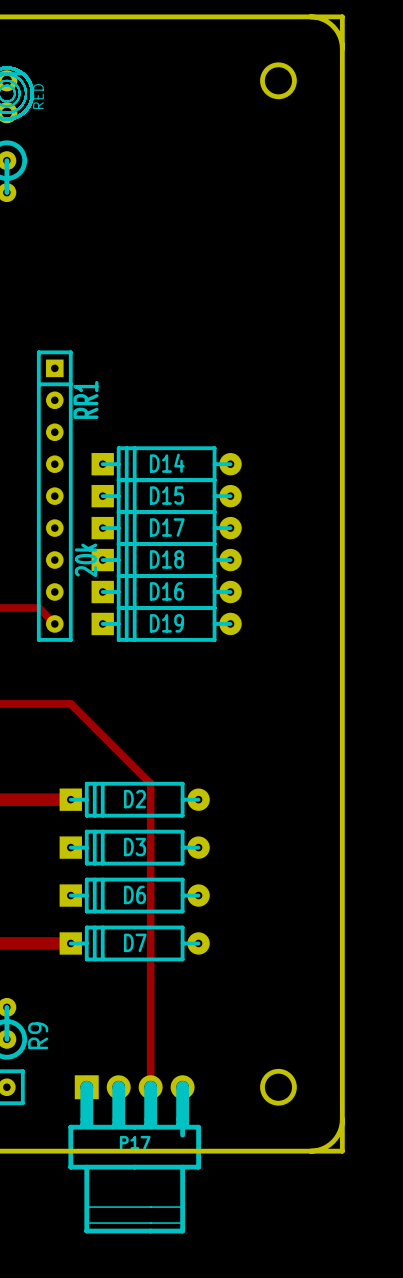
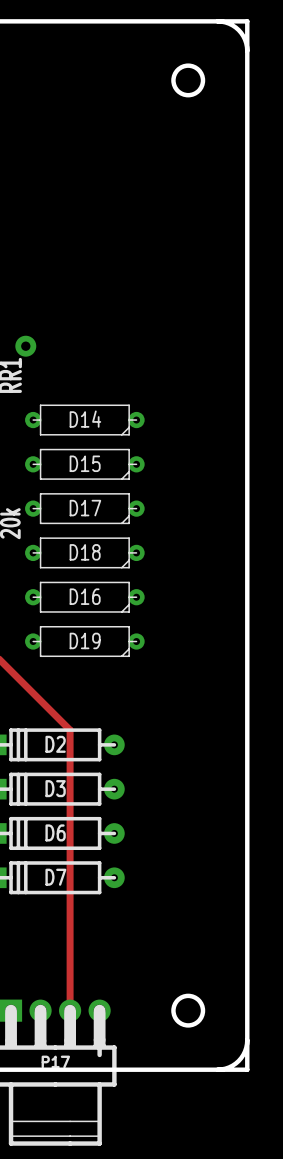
via: none -> (25, 346)
D14 footprint: [91, 446, 242, 483] -> [25, 404, 145, 436]
D15 footprint: [91, 478, 242, 515] -> [25, 448, 145, 480]
D17 footprint: [91, 510, 242, 546] -> [25, 493, 145, 525]
D18 footprint: [91, 542, 242, 578] -> [25, 537, 145, 569]
D16 footprint: [91, 574, 242, 610] -> [25, 581, 145, 613]
D19 footprint: [91, 606, 242, 642] -> [25, 626, 145, 658]

